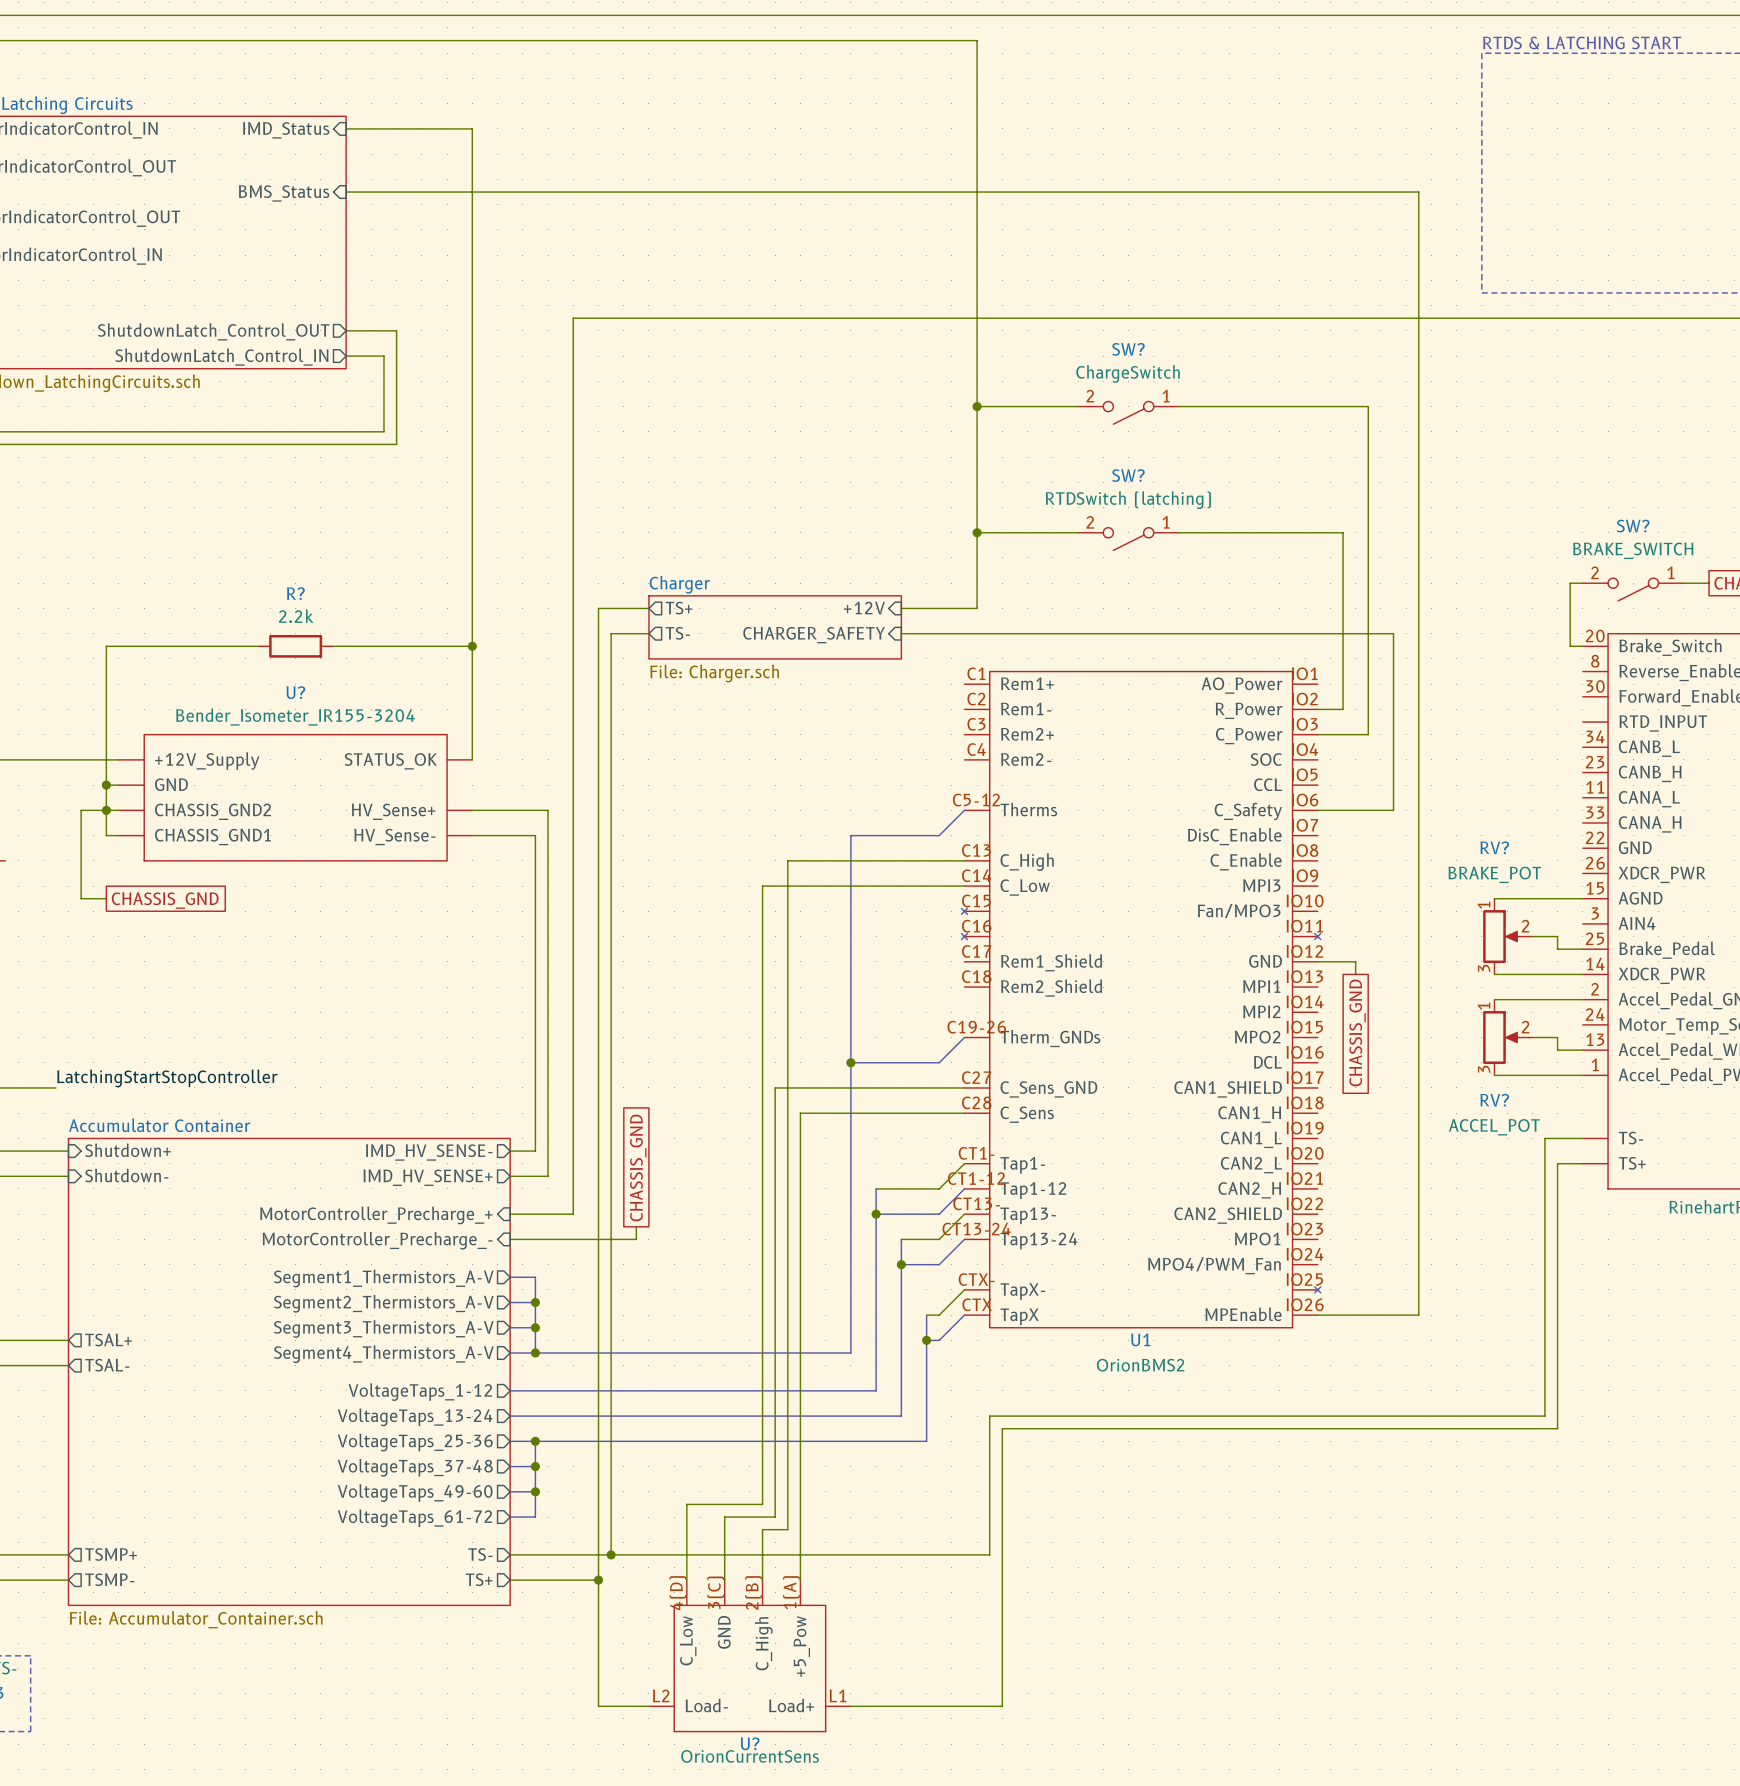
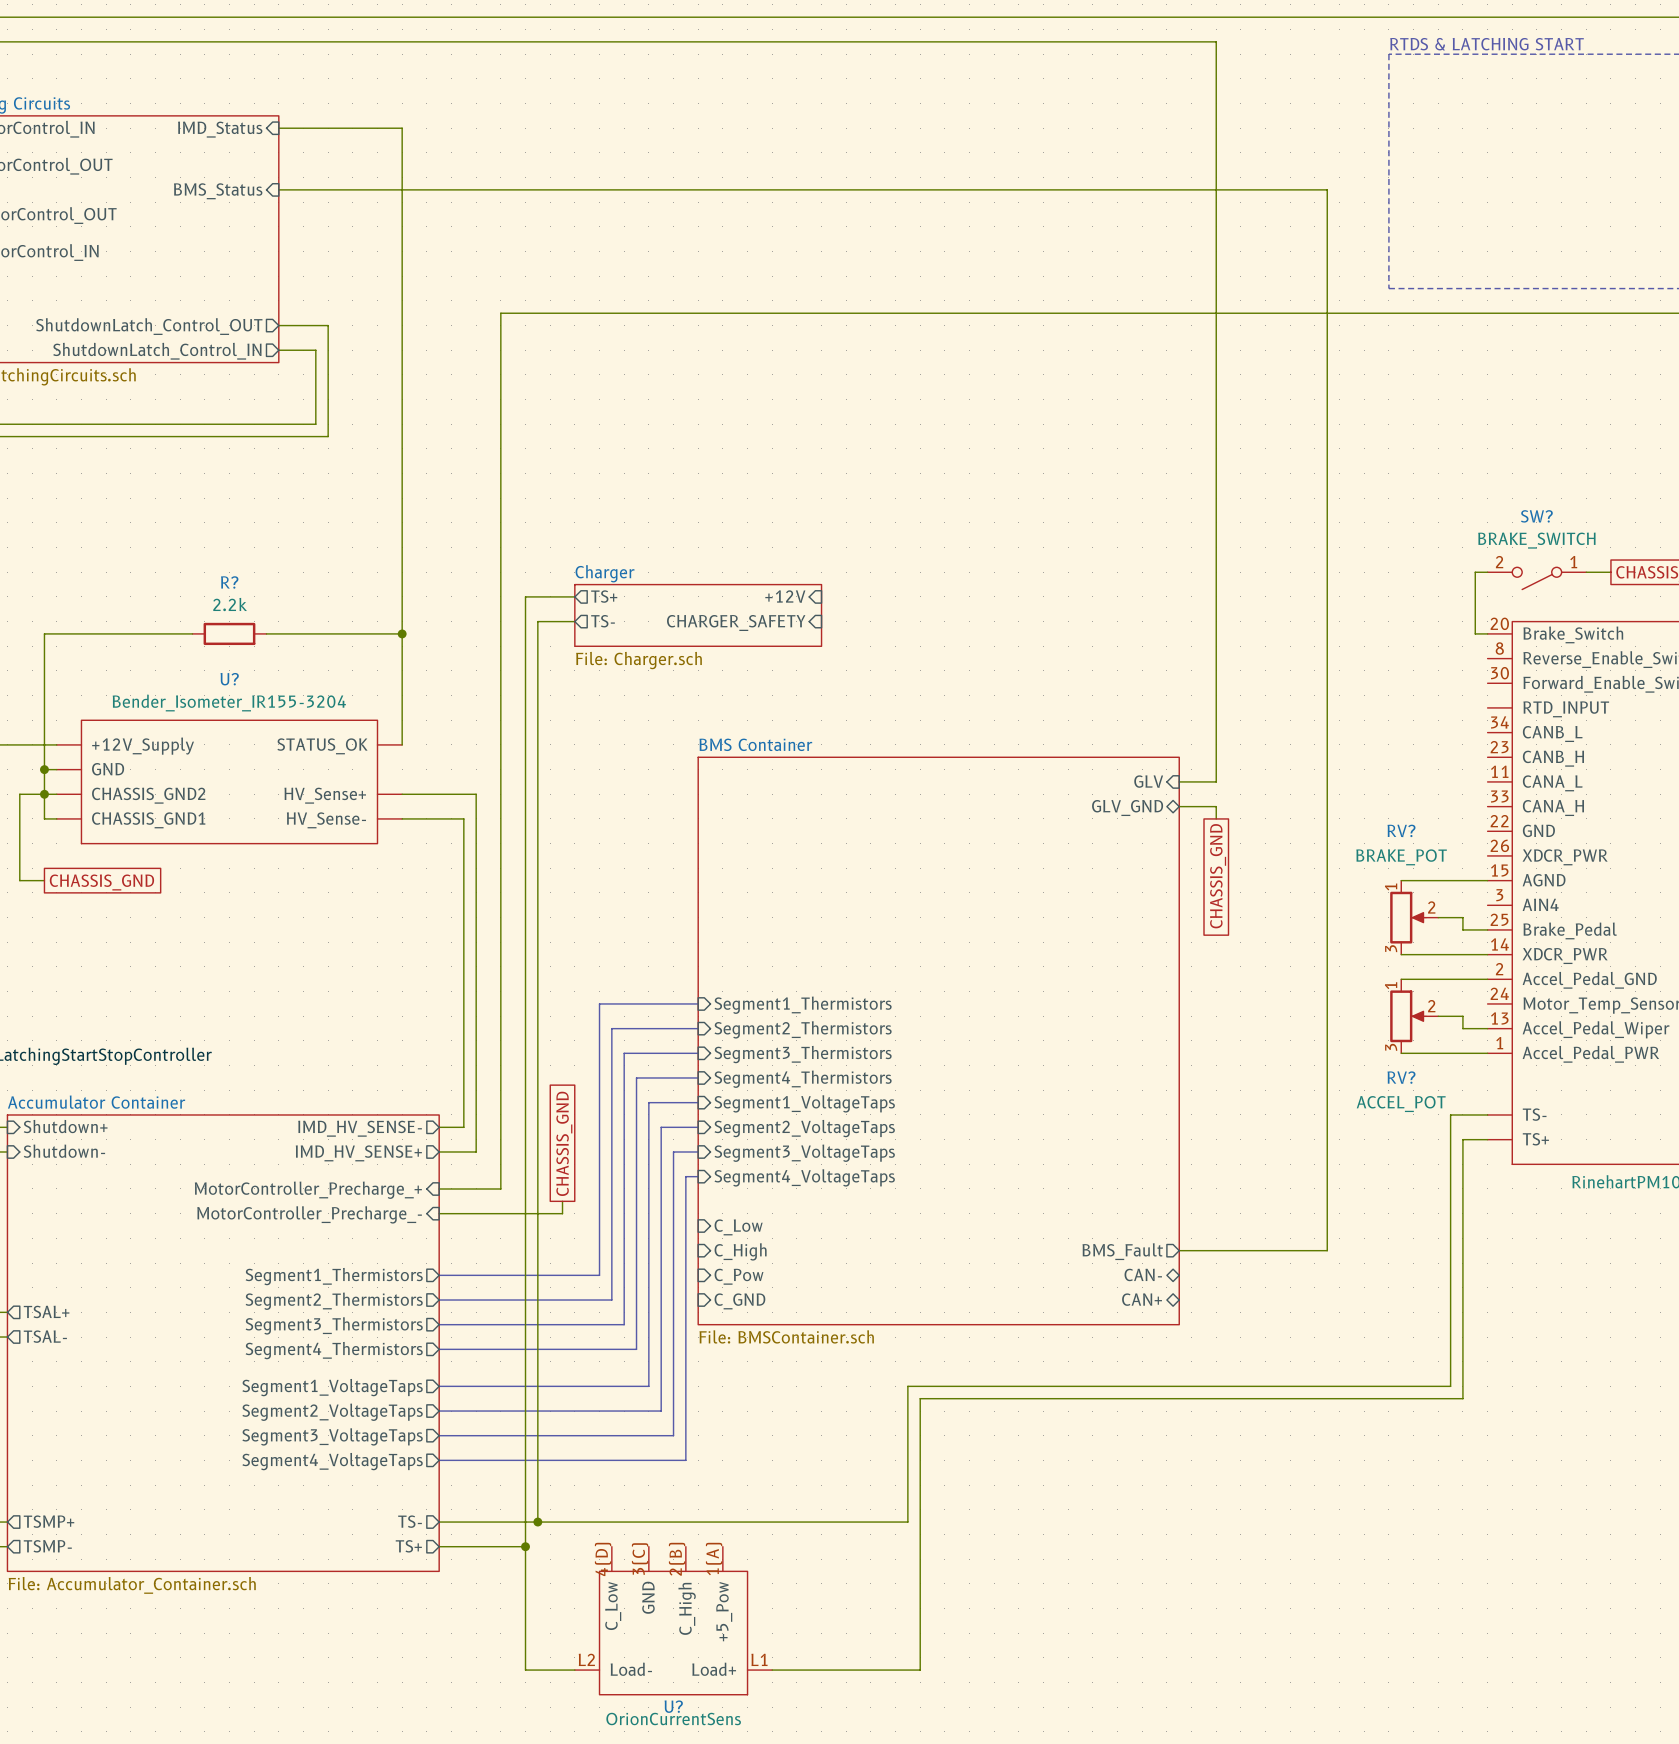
wire: (977, 40) (977, 608) (901, 608) -> (895, 41) (1216, 41) (1216, 781) (1179, 781)
wire: (977, 406) (1078, 406) -> none
junction: (977, 406) -> none
wire: (1178, 406) (1368, 406) (1368, 734) (1317, 734) -> none
SW?: ChargeSwitch (1128, 412) -> none
wire: (977, 532) (1078, 532) -> none
junction: (977, 532) -> none
wire: (1178, 532) (1343, 532) (1343, 709) (1317, 709) -> none
SW?: RTDSwitch (latching) (1128, 539) -> none
wire: (901, 633) (1393, 633) (1393, 810) (1317, 810) -> none
sheet pin: none -> GLV (1148, 781)
bus: (964, 810) (939, 835) (850, 835) (850, 1352) (699, 1352) -> (698, 1053) (624, 1053) (624, 1324)
sheet pin: none -> GLV_GND (1127, 808)
wire: (964, 860) (787, 860) (787, 1529) (762, 1529) (762, 1580) -> none
wire: (964, 886) (762, 886) (762, 1504) (686, 1504) (686, 1580) -> none
wire: (1317, 961) (1355, 961) (1355, 974) -> (1179, 806) (1216, 806) (1216, 818)
U1: OrionBMS2 (1141, 999) -> none
bus: none -> (698, 1003) (599, 1003) (599, 1275) (463, 1275)
sheet pin: none -> Segment1_Thermistors (803, 1005)
global label position: CHASSIS_GND (1357, 1032) -> CHASSIS_GND (1218, 876)
bus: (964, 1037) (939, 1062) (850, 1062) -> none
bus: none -> (698, 1028) (611, 1028) (611, 1300) (463, 1300)
sheet pin: none -> Segment2_Thermistors (803, 1029)
junction: (850, 1062) -> none
sheet BMS Container: none -> File: BMSContainer.sch (938, 1040)
sheet pin: none -> Segment3_Thermistors (803, 1054)
wire: (964, 1087) (775, 1087) (775, 1517) (724, 1517) (724, 1580) -> none
bus: none -> (698, 1077) (636, 1077) (636, 1349) (439, 1349)
sheet pin: none -> Segment4_Thermistors (803, 1079)
wire: (964, 1113) (800, 1113) (800, 1580) -> none
sheet pin: none -> Segment1_VoltageTaps (804, 1103)
sheet pin: none -> Segment2_VoltageTaps (804, 1128)
wire: (964, 1163) (939, 1188) (876, 1188) -> none
bus: none -> (698, 1151) (673, 1151) (673, 1435) (463, 1435)
sheet pin: none -> Segment3_VoltageTaps (804, 1153)
bus: (876, 1188) (876, 1390) (510, 1390) -> none
bus: (964, 1188) (939, 1214) (876, 1214) -> none
bus: none -> (698, 1176) (685, 1176) (685, 1460) (463, 1460)
sheet pin: none -> Segment4_VoltageTaps (804, 1177)
junction: (876, 1214) -> none
wire: (964, 1214) (939, 1239) (901, 1239) -> none
bus: (901, 1239) (901, 1416) (724, 1416) -> (698, 1102) (648, 1102) (648, 1386)
bus: (964, 1239) (939, 1264) (901, 1264) -> none
sheet pin: none -> C_Low (738, 1227)
junction: (901, 1264) -> none
bus: (510, 1277) (535, 1277) (535, 1352) -> none
wire: (1418, 1277) (1418, 1315) (1317, 1315) -> (1327, 1250) (1179, 1250)
sheet pin: Segment1_Thermistors_A-V (383, 1278) -> none
sheet pin: none -> C_High (740, 1251)
sheet pin: none -> BMS_Fault (1122, 1251)
wire: (964, 1289) (939, 1315) (926, 1315) -> none
junction: (535, 1302) -> none
sheet pin: none -> CAN- (1143, 1274)
sheet pin: Segment2_Thermistors_A-V (383, 1303) -> Segment1_Thermistors (334, 1276)
sheet pin: none -> C_Pow (739, 1276)
bus: (926, 1315) (926, 1441) (737, 1441) -> (698, 1127) (661, 1127) (661, 1411)
bus: (964, 1315) (939, 1340) (926, 1340) -> none
junction: (535, 1327) -> none
sheet pin: none -> CAN+ (1142, 1299)
sheet pin: Segment3_Thermistors_A-V (383, 1329) -> Segment2_Thermistors (334, 1301)
sheet pin: none -> C_GND (739, 1301)
junction: (926, 1340) -> none
junction: (535, 1352) -> none
sheet pin: Segment4_Thermistors_A-V (383, 1354) -> Segment3_Thermistors (334, 1325)
sheet pin: none -> Segment4_Thermistors (334, 1350)
sheet pin: VoltageTaps_1-12 (420, 1392) -> none
sheet pin: VoltageTaps_13-24 (415, 1417) -> Segment1_VoltageTaps (332, 1387)
bus: (535, 1441) (535, 1517) (510, 1517) -> none
junction: (535, 1441) -> none
sheet pin: VoltageTaps_25-36 (415, 1442) -> Segment2_VoltageTaps (332, 1412)
junction: (535, 1466) -> none
sheet pin: VoltageTaps_37-48 (415, 1467) -> Segment3_VoltageTaps (332, 1436)
junction: (535, 1491) -> none
sheet pin: VoltageTaps_49-60 (415, 1493) -> Segment4_VoltageTaps (332, 1461)
sheet pin: VoltageTaps_61-72 (414, 1518) -> none

